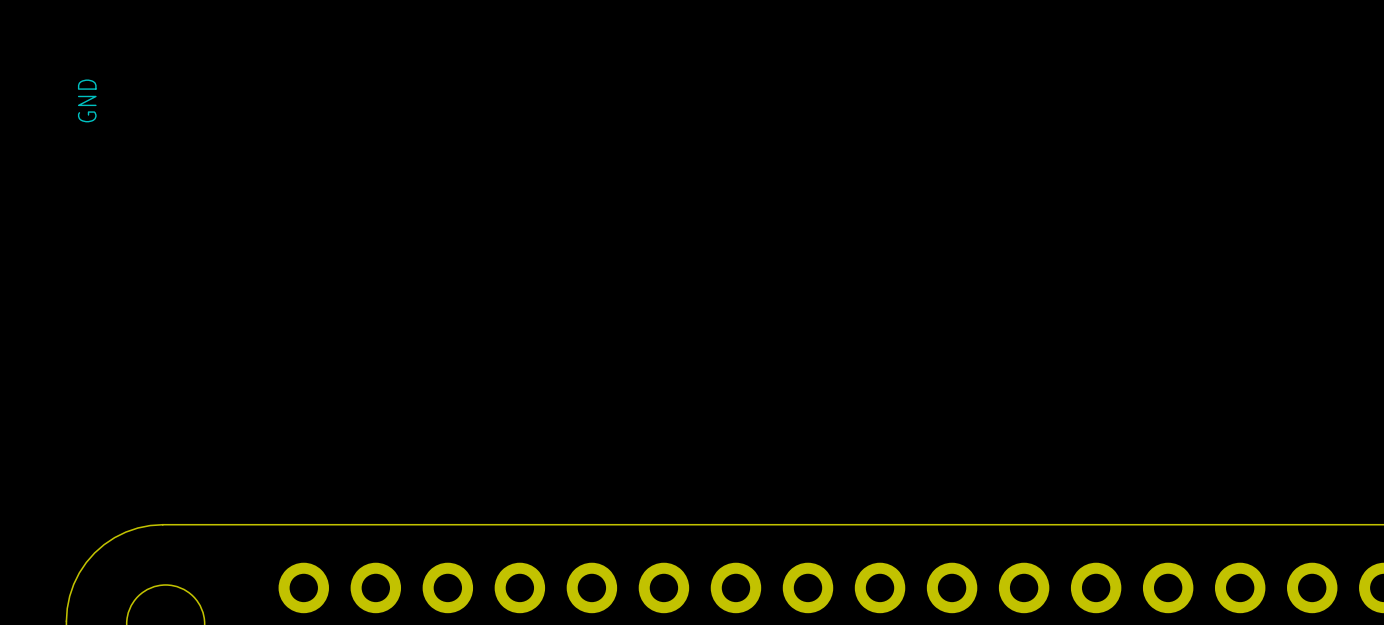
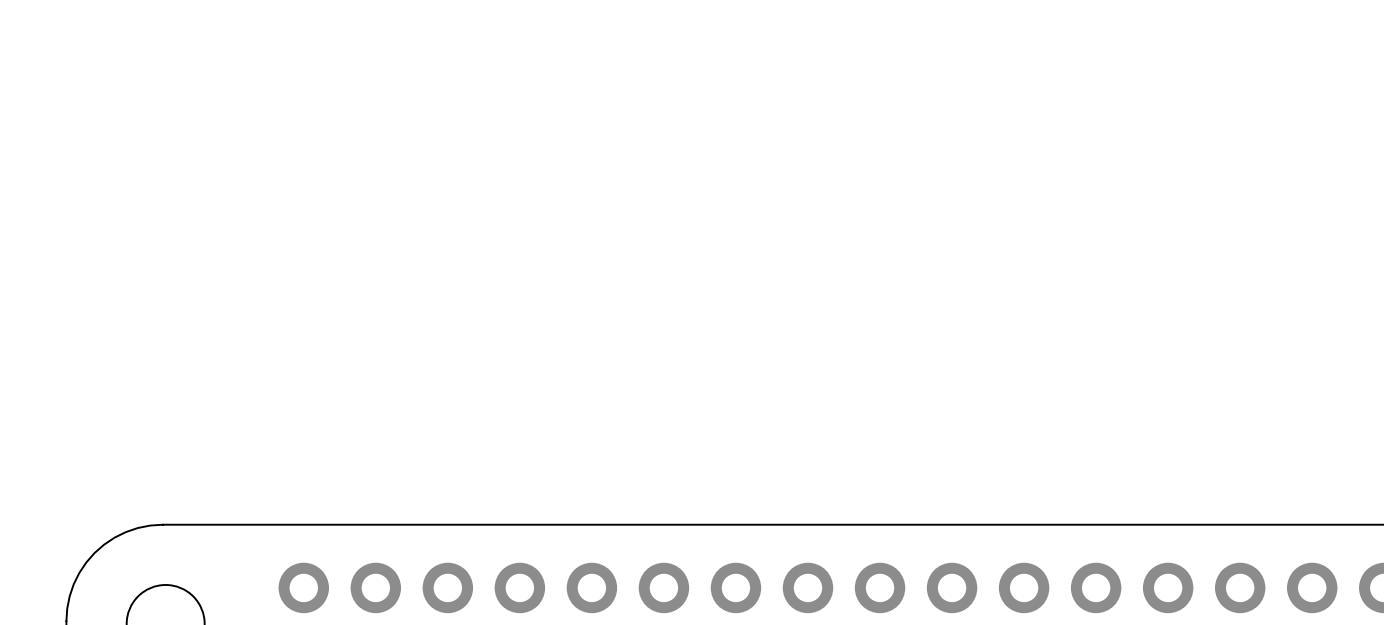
text: GND (87, 100) -> none

